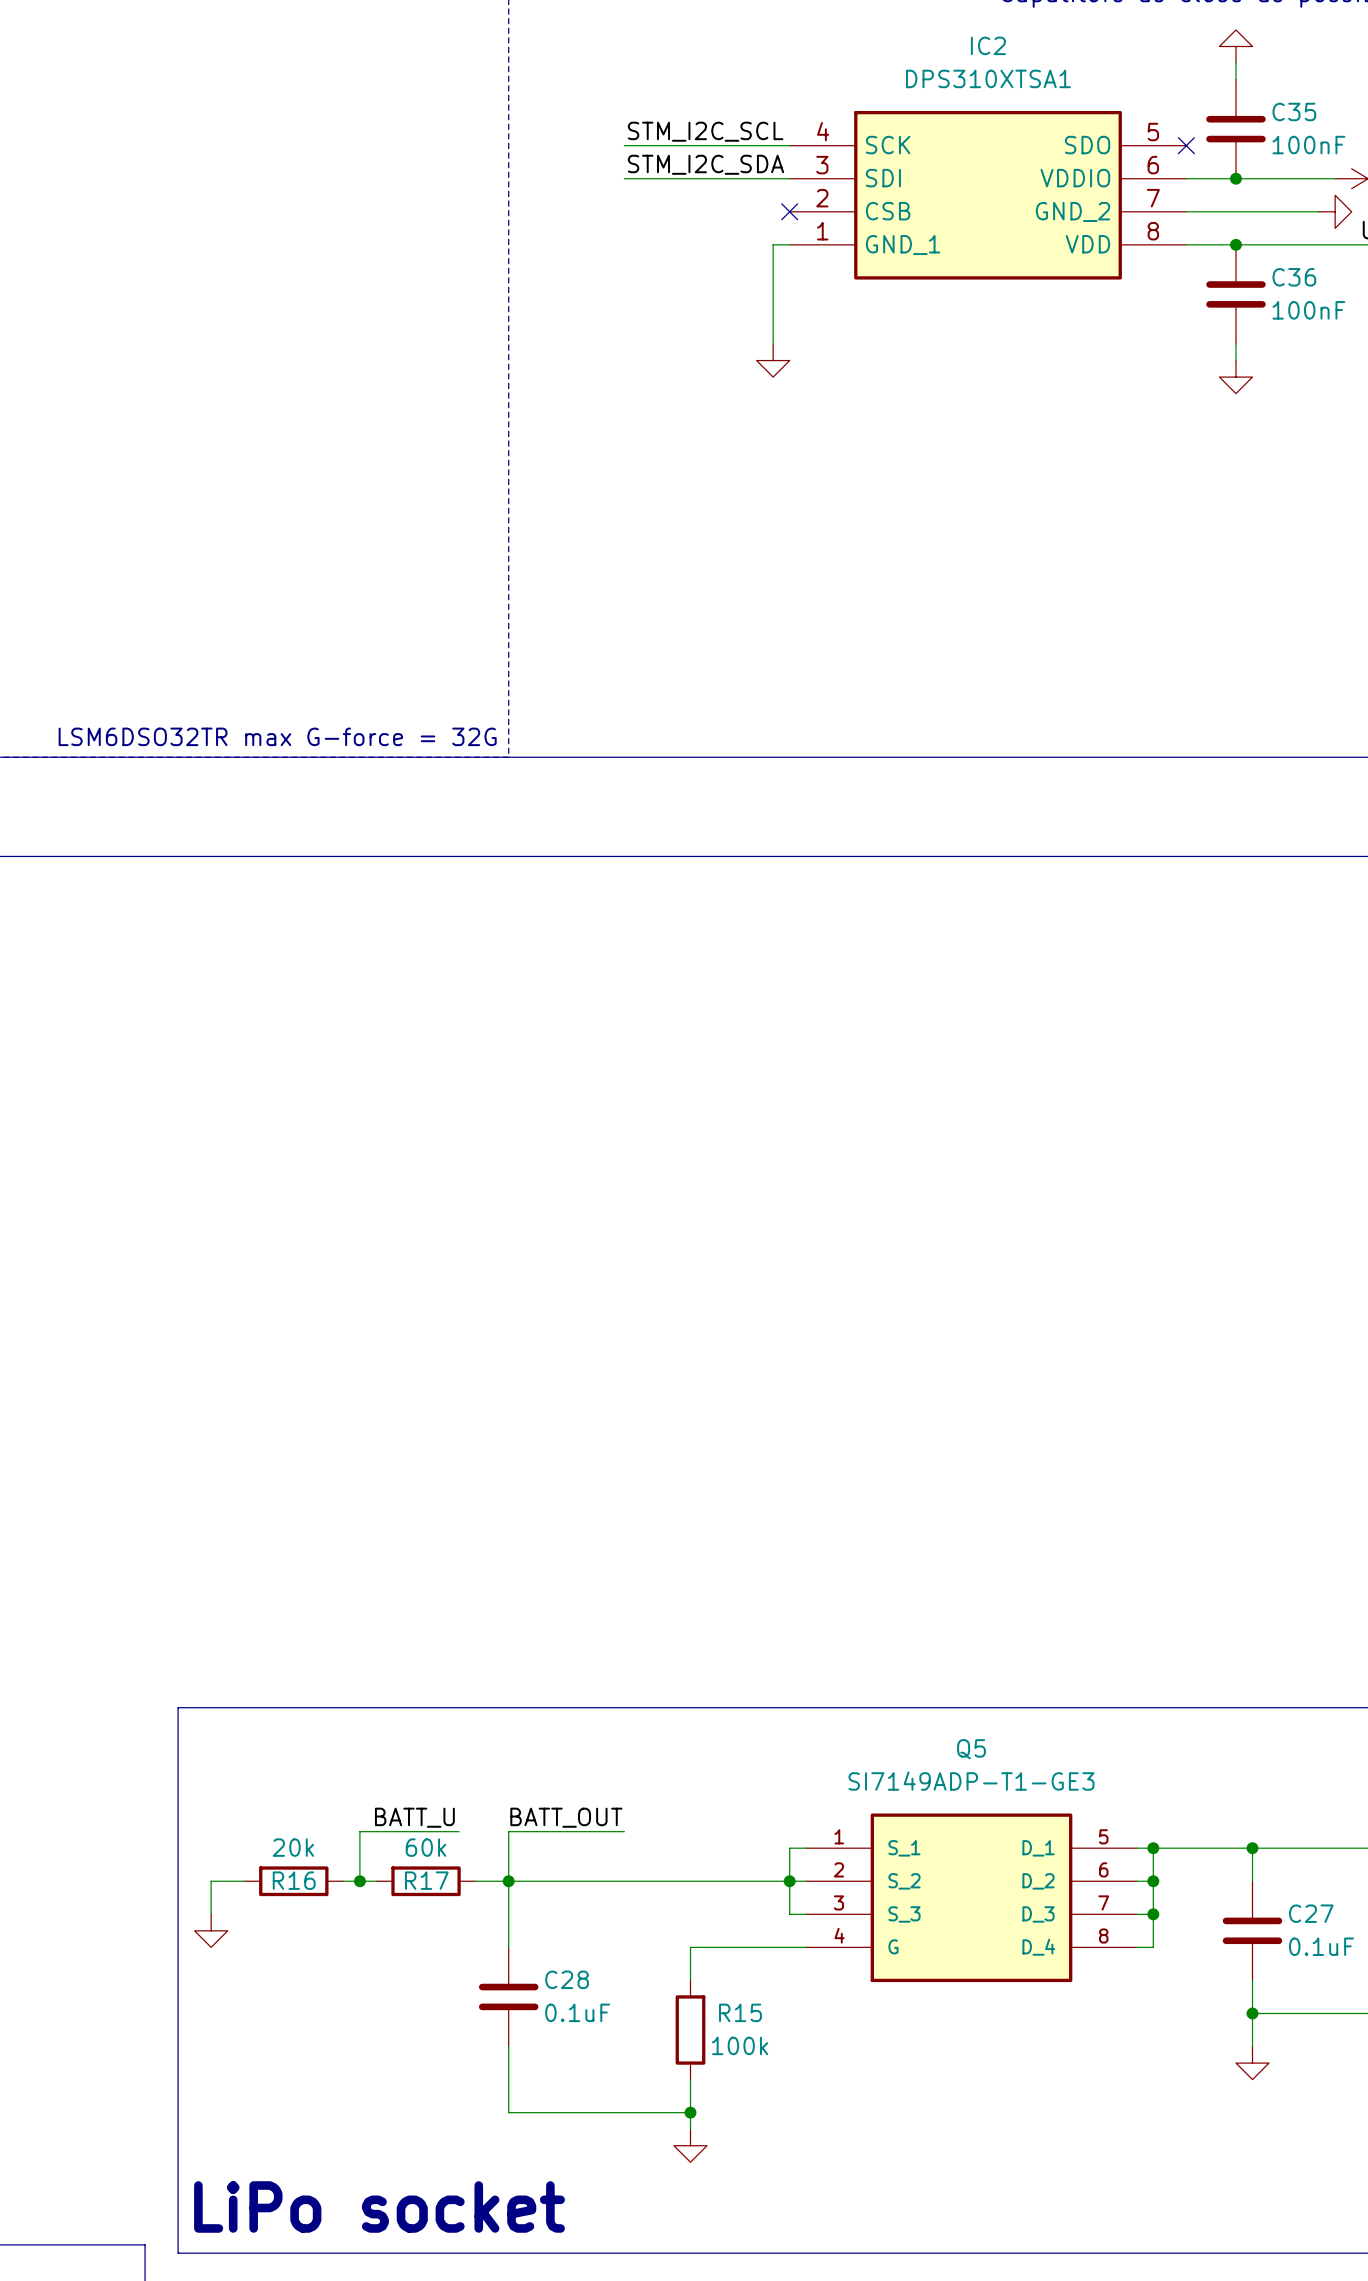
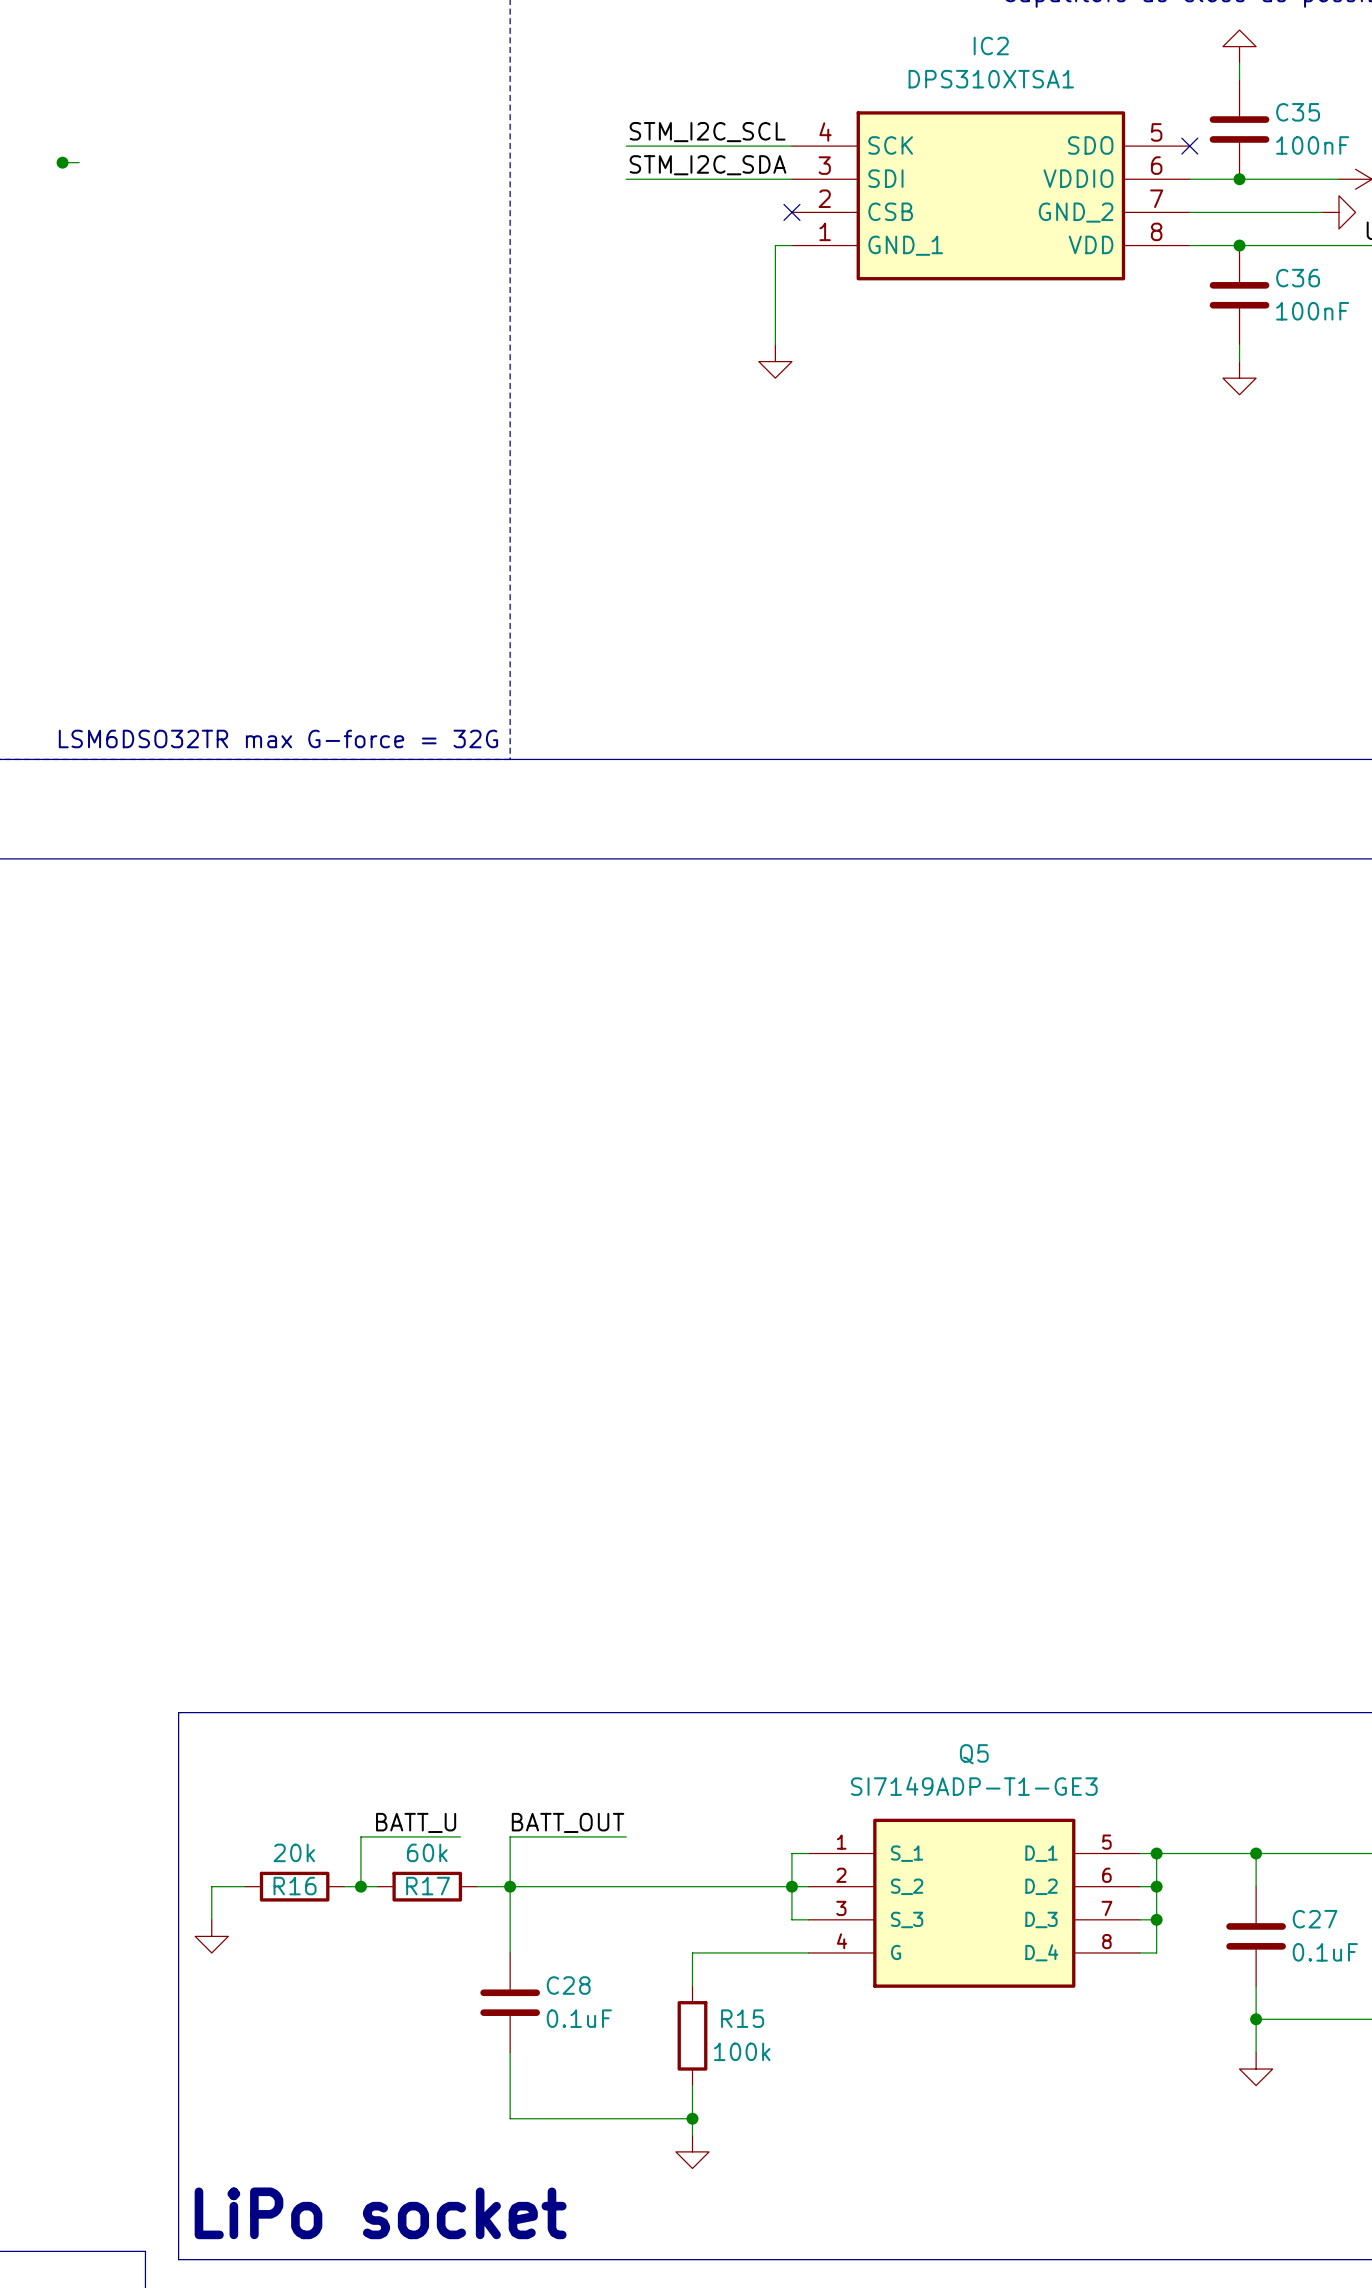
wire: none -> (62, 162) (79, 162)
junction: none -> (62, 162)

